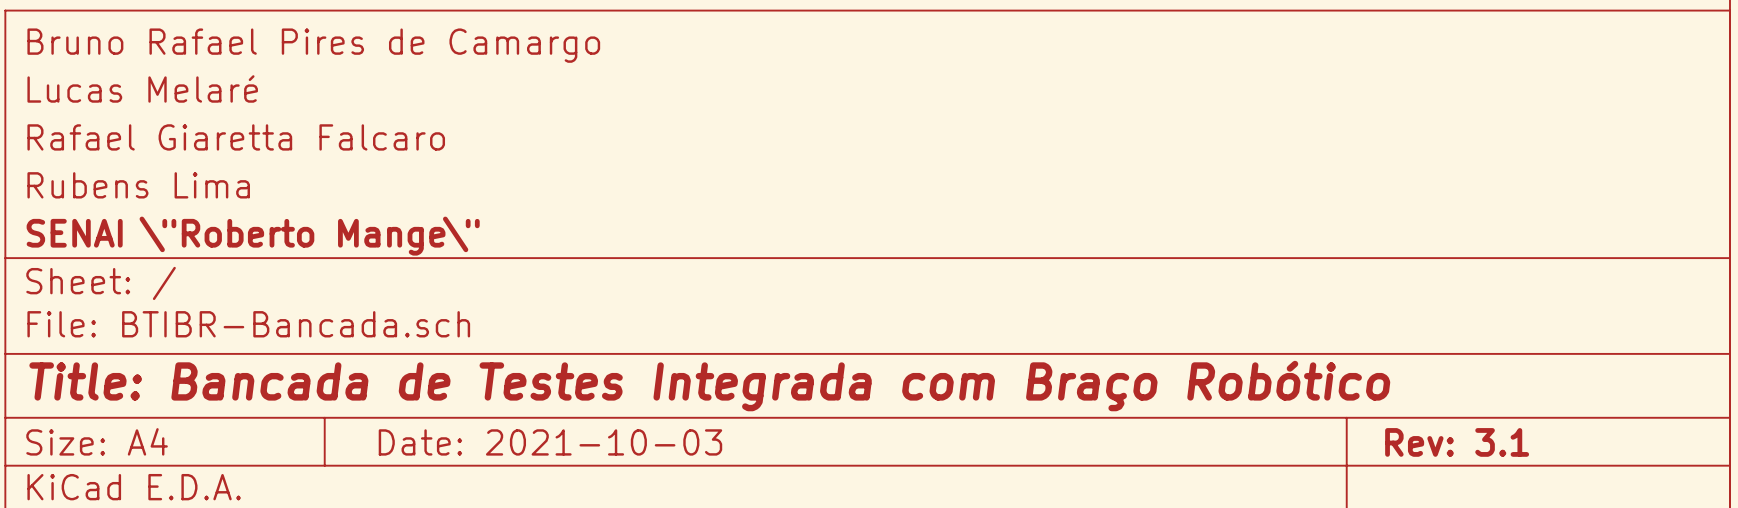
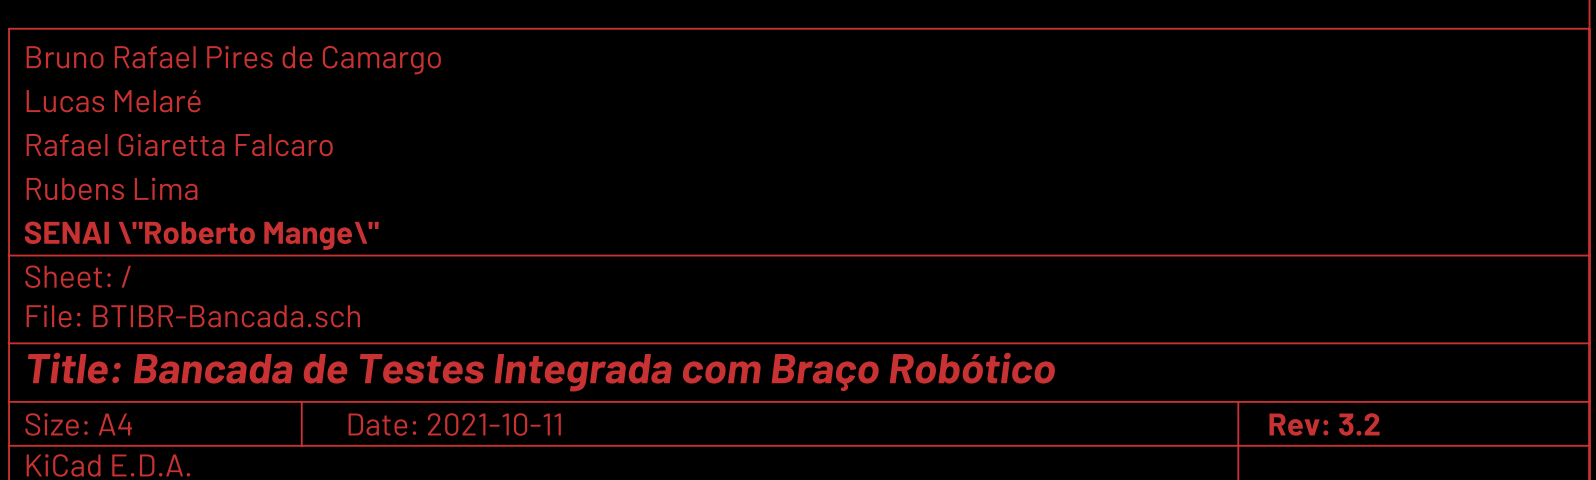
title block: Date: 2021-10-03 (550, 442) -> Date: 2021-10-11 (454, 424)
title block: Rev: 3.1 (1457, 442) -> Rev: 3.2 (1324, 424)

